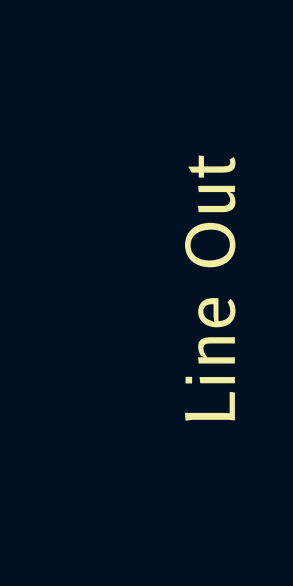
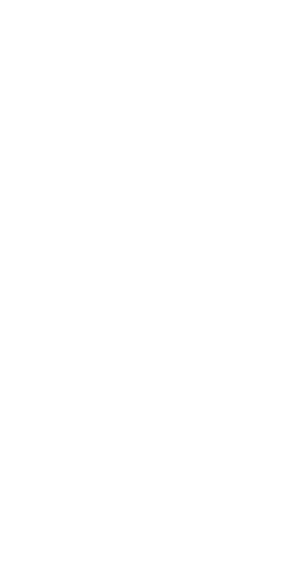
text: Line Out (210, 288) -> none

